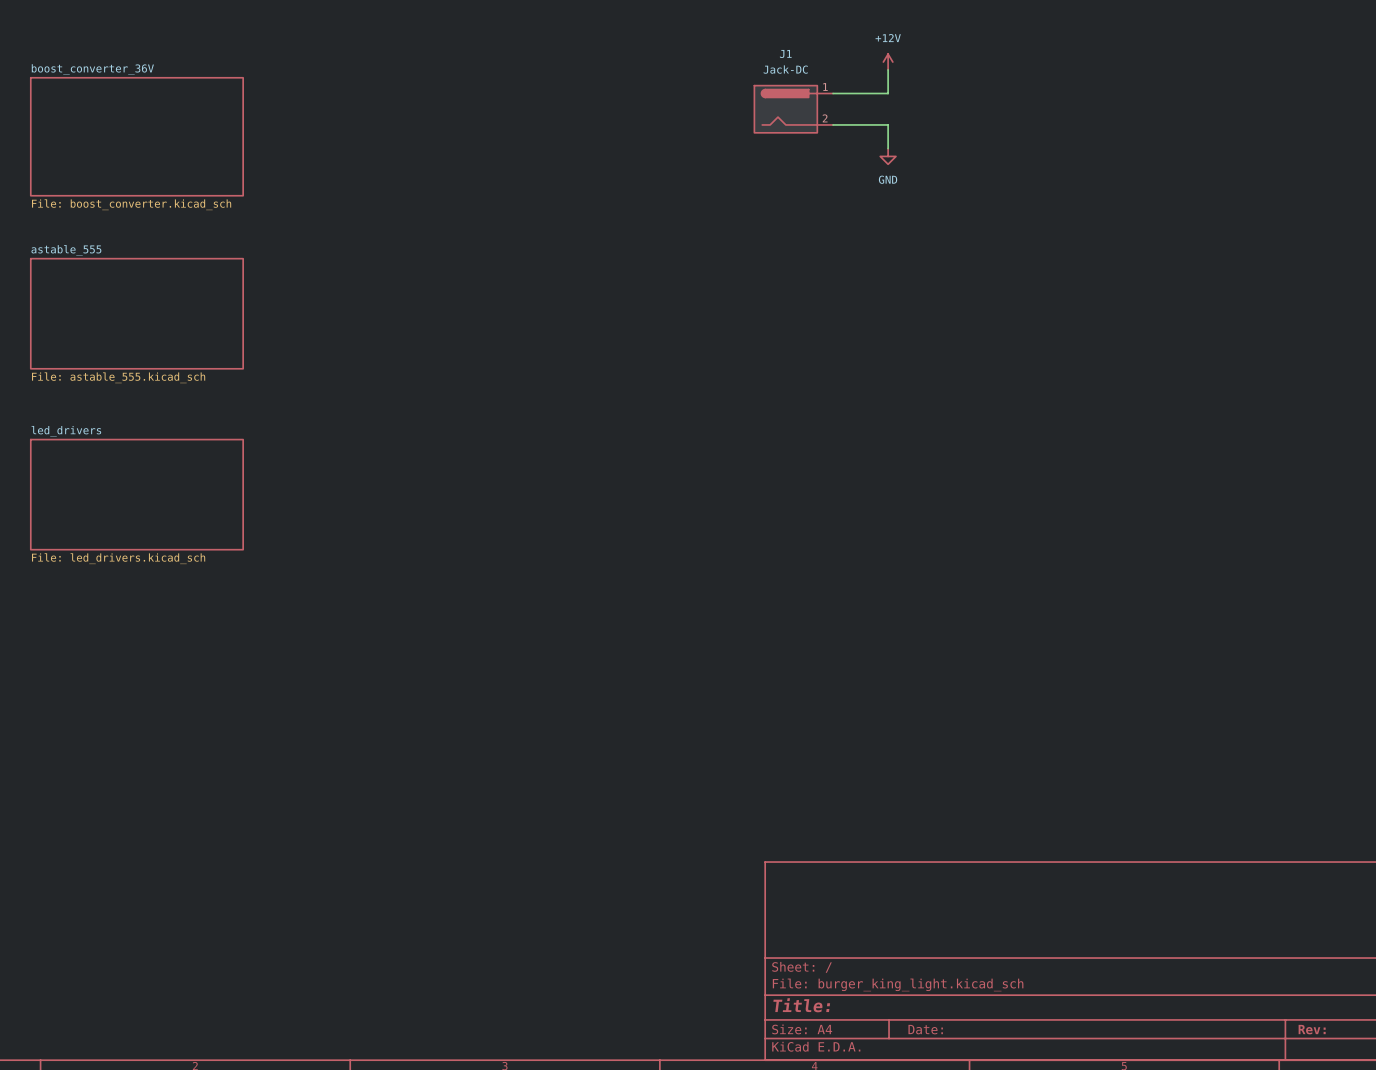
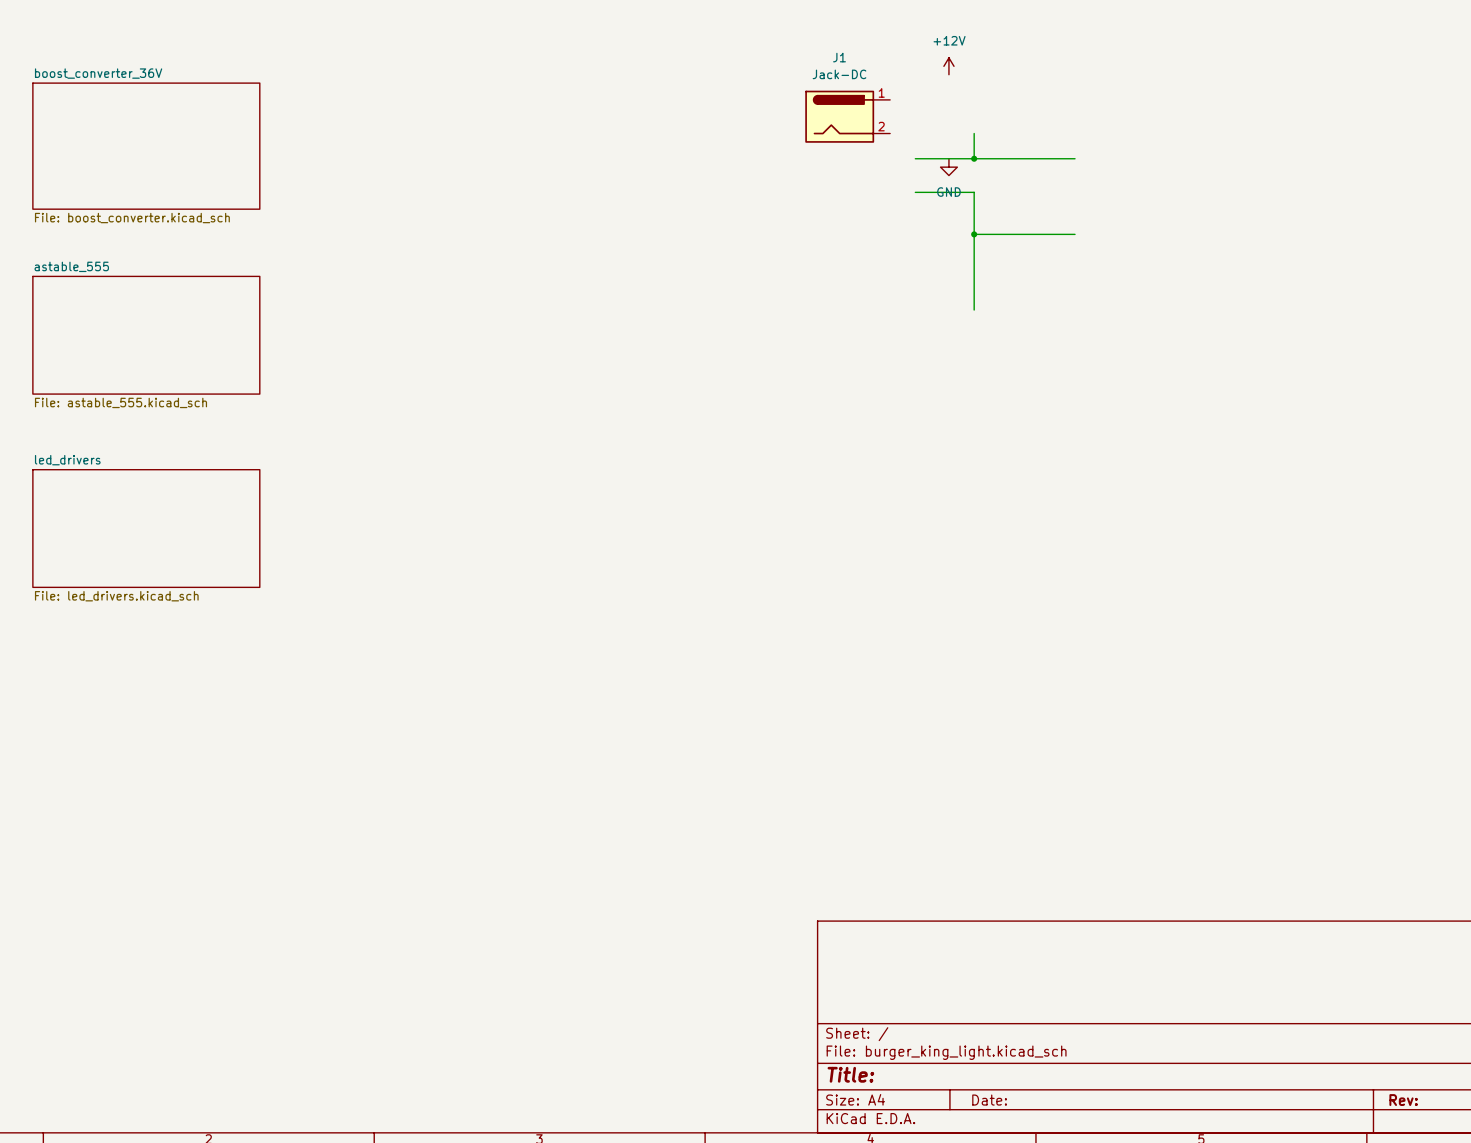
wire: (888, 69) (888, 93) (833, 93) -> none
wire: (833, 124) (888, 124) (888, 148) -> none
wire: none -> (974, 133) (974, 158)
wire: none -> (915, 158) (1075, 158)
junction: none -> (974, 158)
wire: none -> (915, 192) (974, 192) (974, 310)
wire: none -> (974, 234) (1075, 234)
junction: none -> (974, 234)

